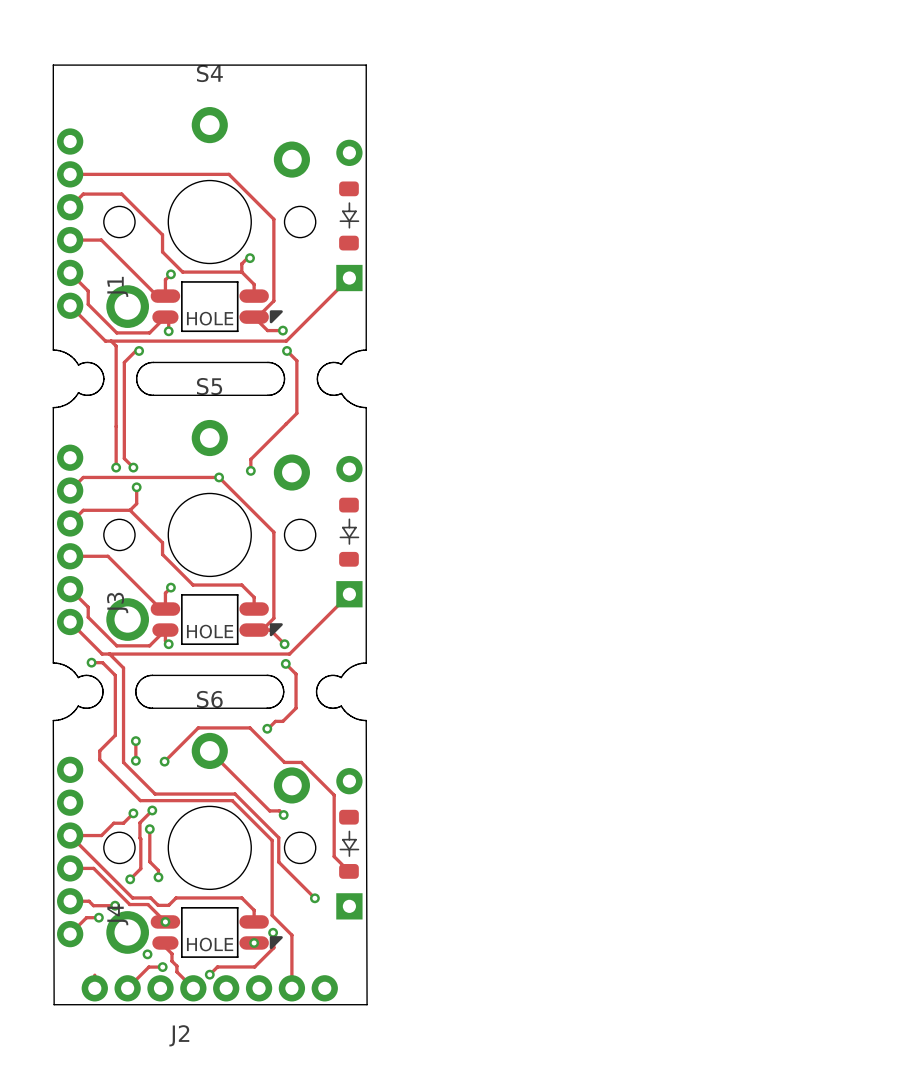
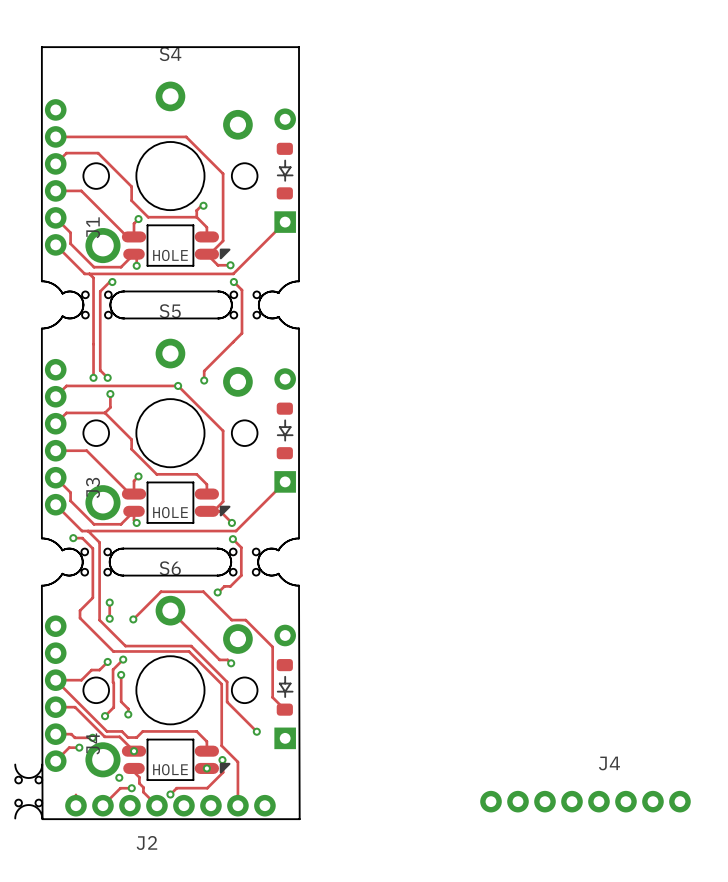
part: none -> (96, 304)
part: none -> (245, 304)
part: none -> (96, 562)
part: none -> (244, 562)
part: none -> (28, 791)
J4: none -> (585, 801)

